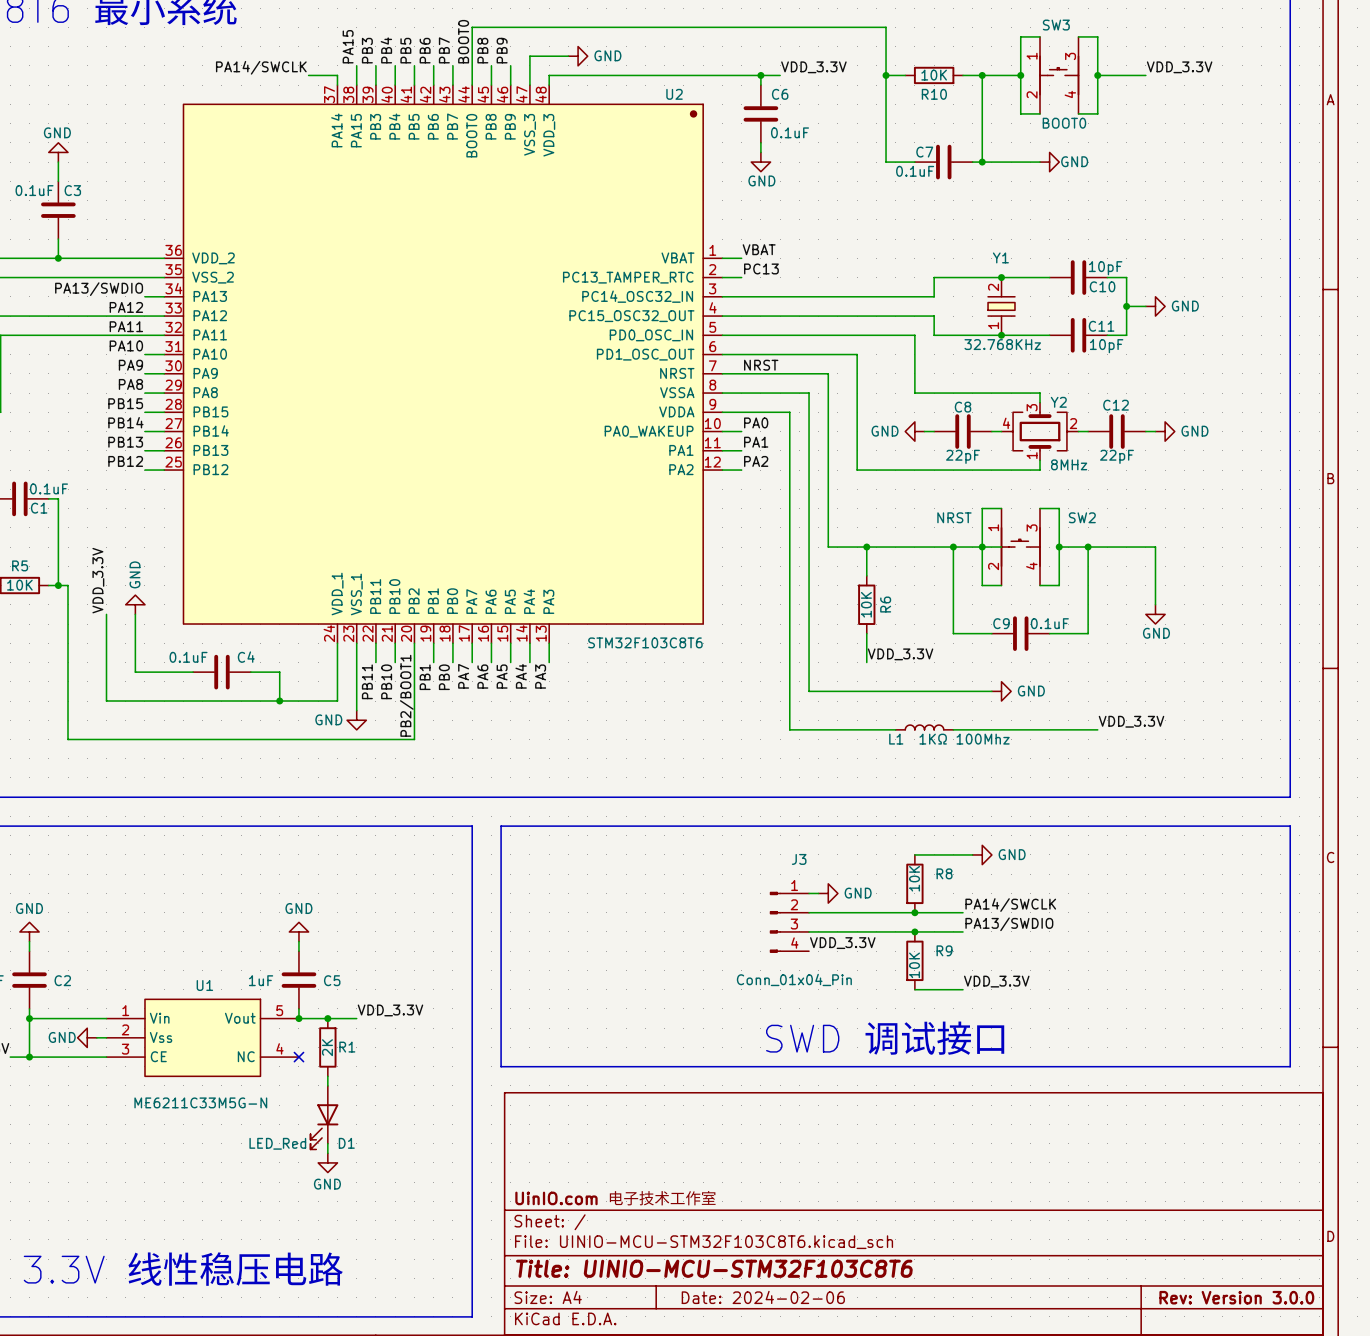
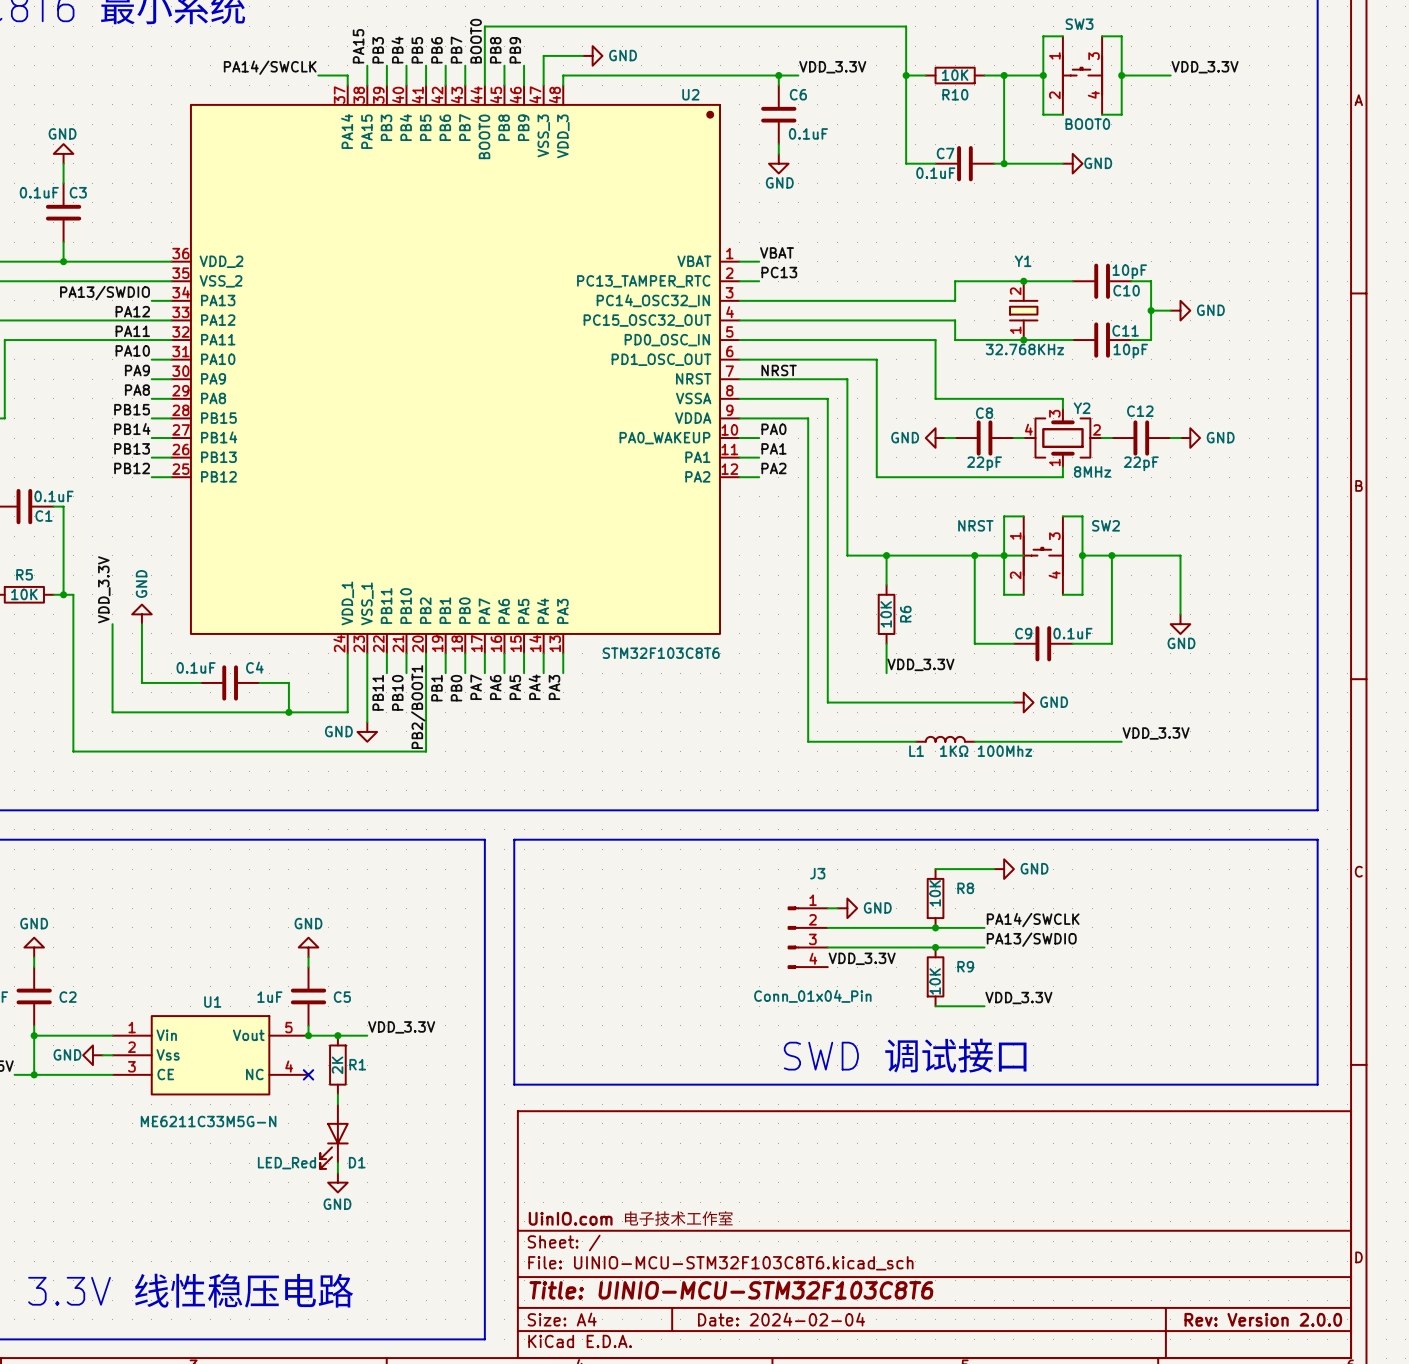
title block: Date: 2024-02-06 (763, 1297) -> Date: 2024-02-04 (781, 1319)
title block: Rev: Version 3.0.0 (1236, 1297) -> Rev: Version 2.0.0 (1263, 1319)

